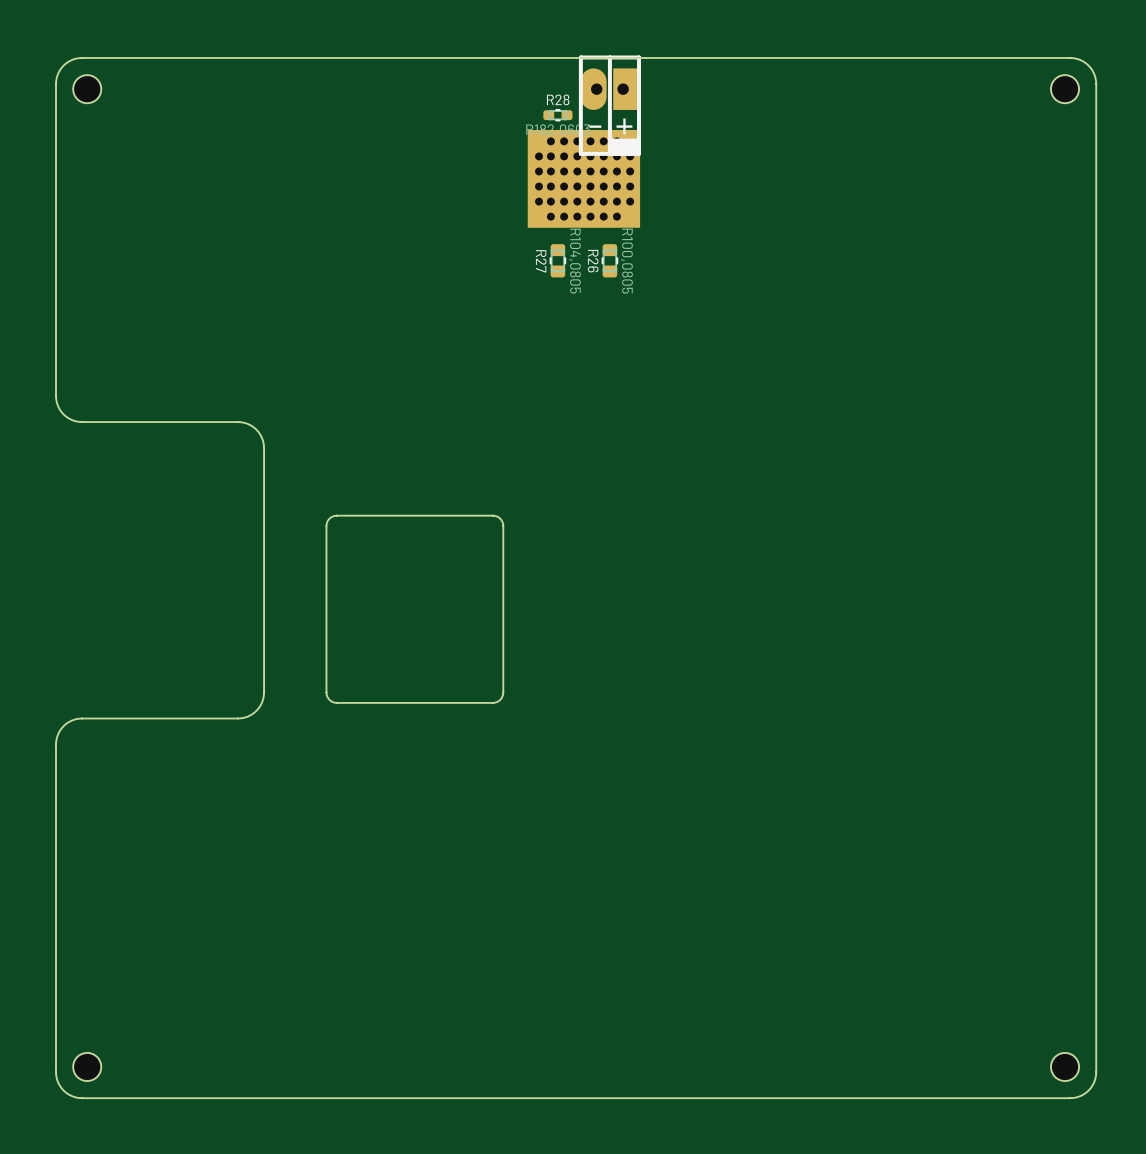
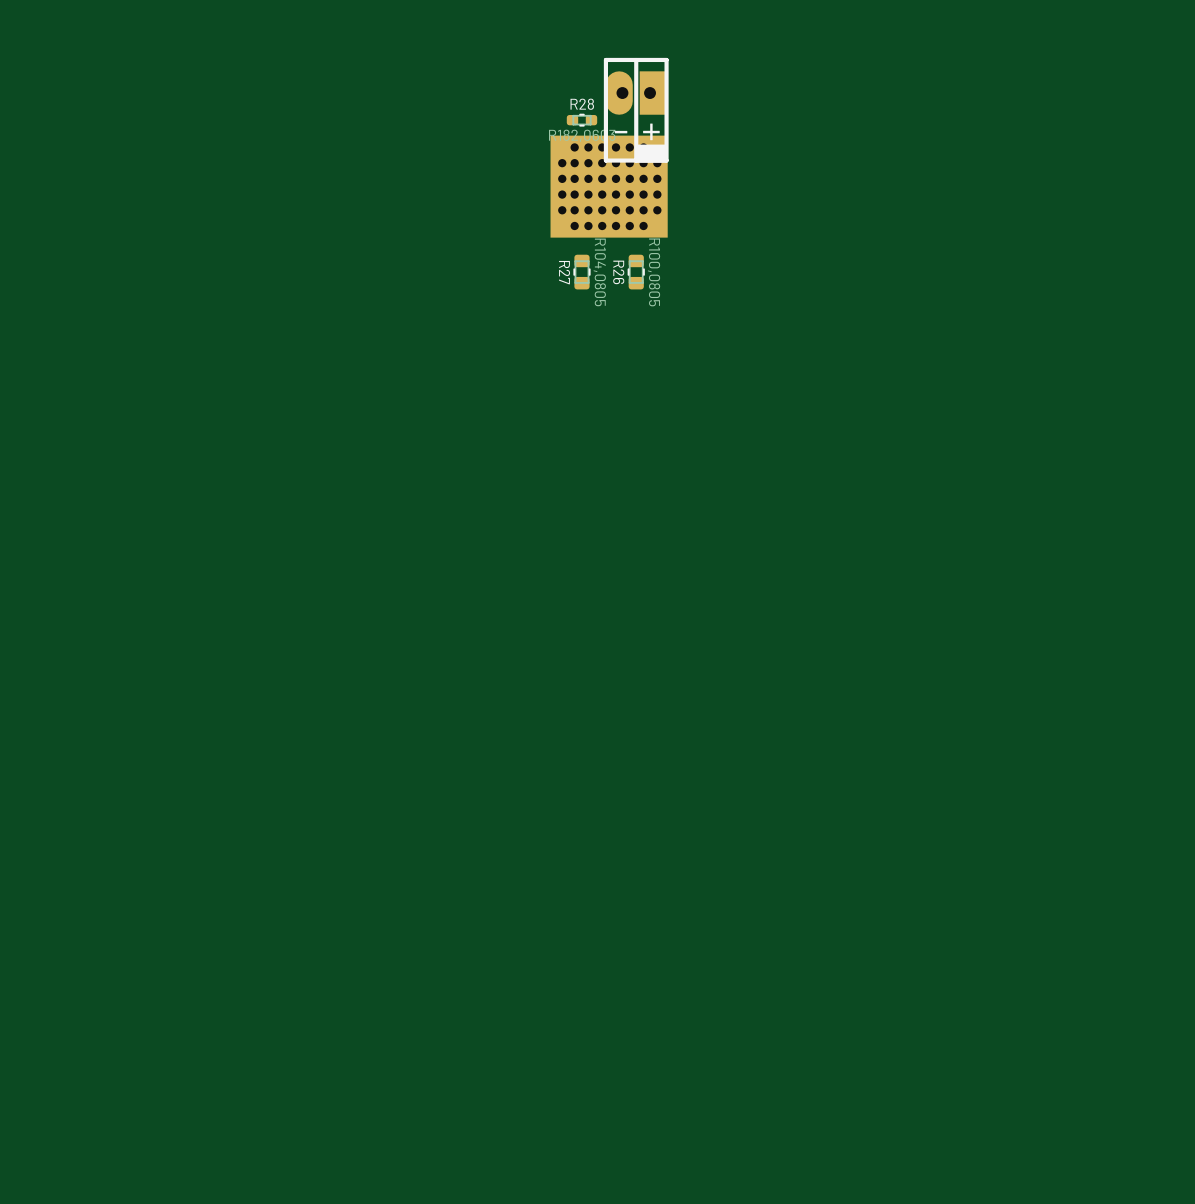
board edge: (1070, 57) (82, 57) (72, 59) (63, 65) (57, 74) (56, 83) (56, 396) (59, 409) (69, 418) (78, 421) (241, 422) (256, 429) (262, 438) (264, 448) (264, 692) (258, 708) (251, 715) (238, 718) (78, 718) (63, 726) (56, 737) (56, 1072) (57, 1082) (63, 1090) (72, 1096) (82, 1098) (1070, 1098) (1080, 1096) (1088, 1090) (1094, 1082) (1096, 1072) (1096, 83) (1094, 74) (1088, 65) (1080, 59) (1070, 57) -> none
part: (87, 89) -> none
part: (1065, 89) -> none
board edge: (492, 515) (336, 515) (329, 518) (326, 526) (326, 692) (329, 699) (336, 702) (492, 702) (500, 699) (503, 692) (503, 526) (500, 518) (492, 515) -> none
part: (87, 1066) -> none
part: (1065, 1066) -> none

